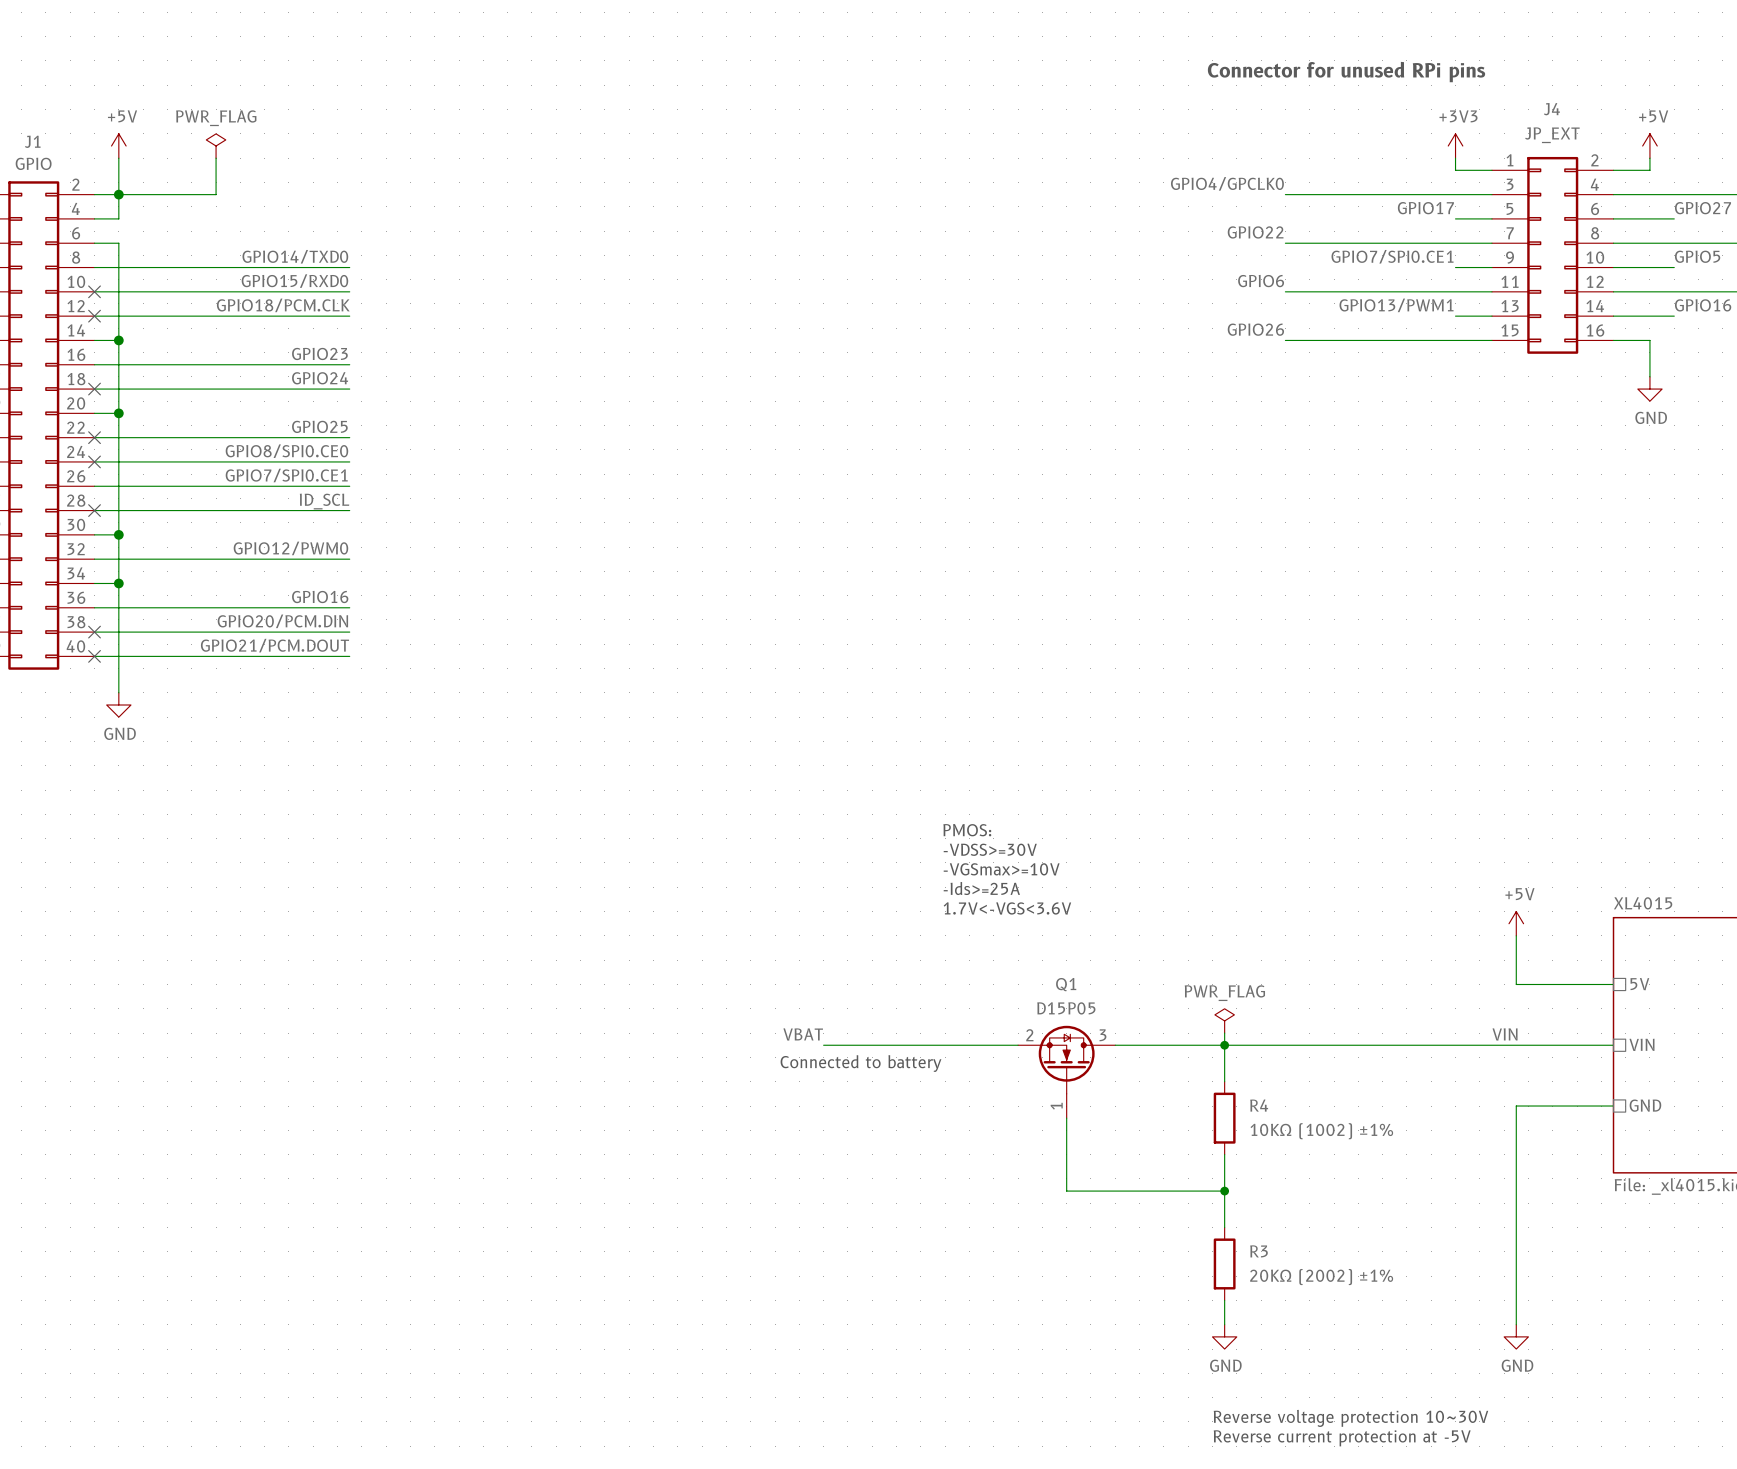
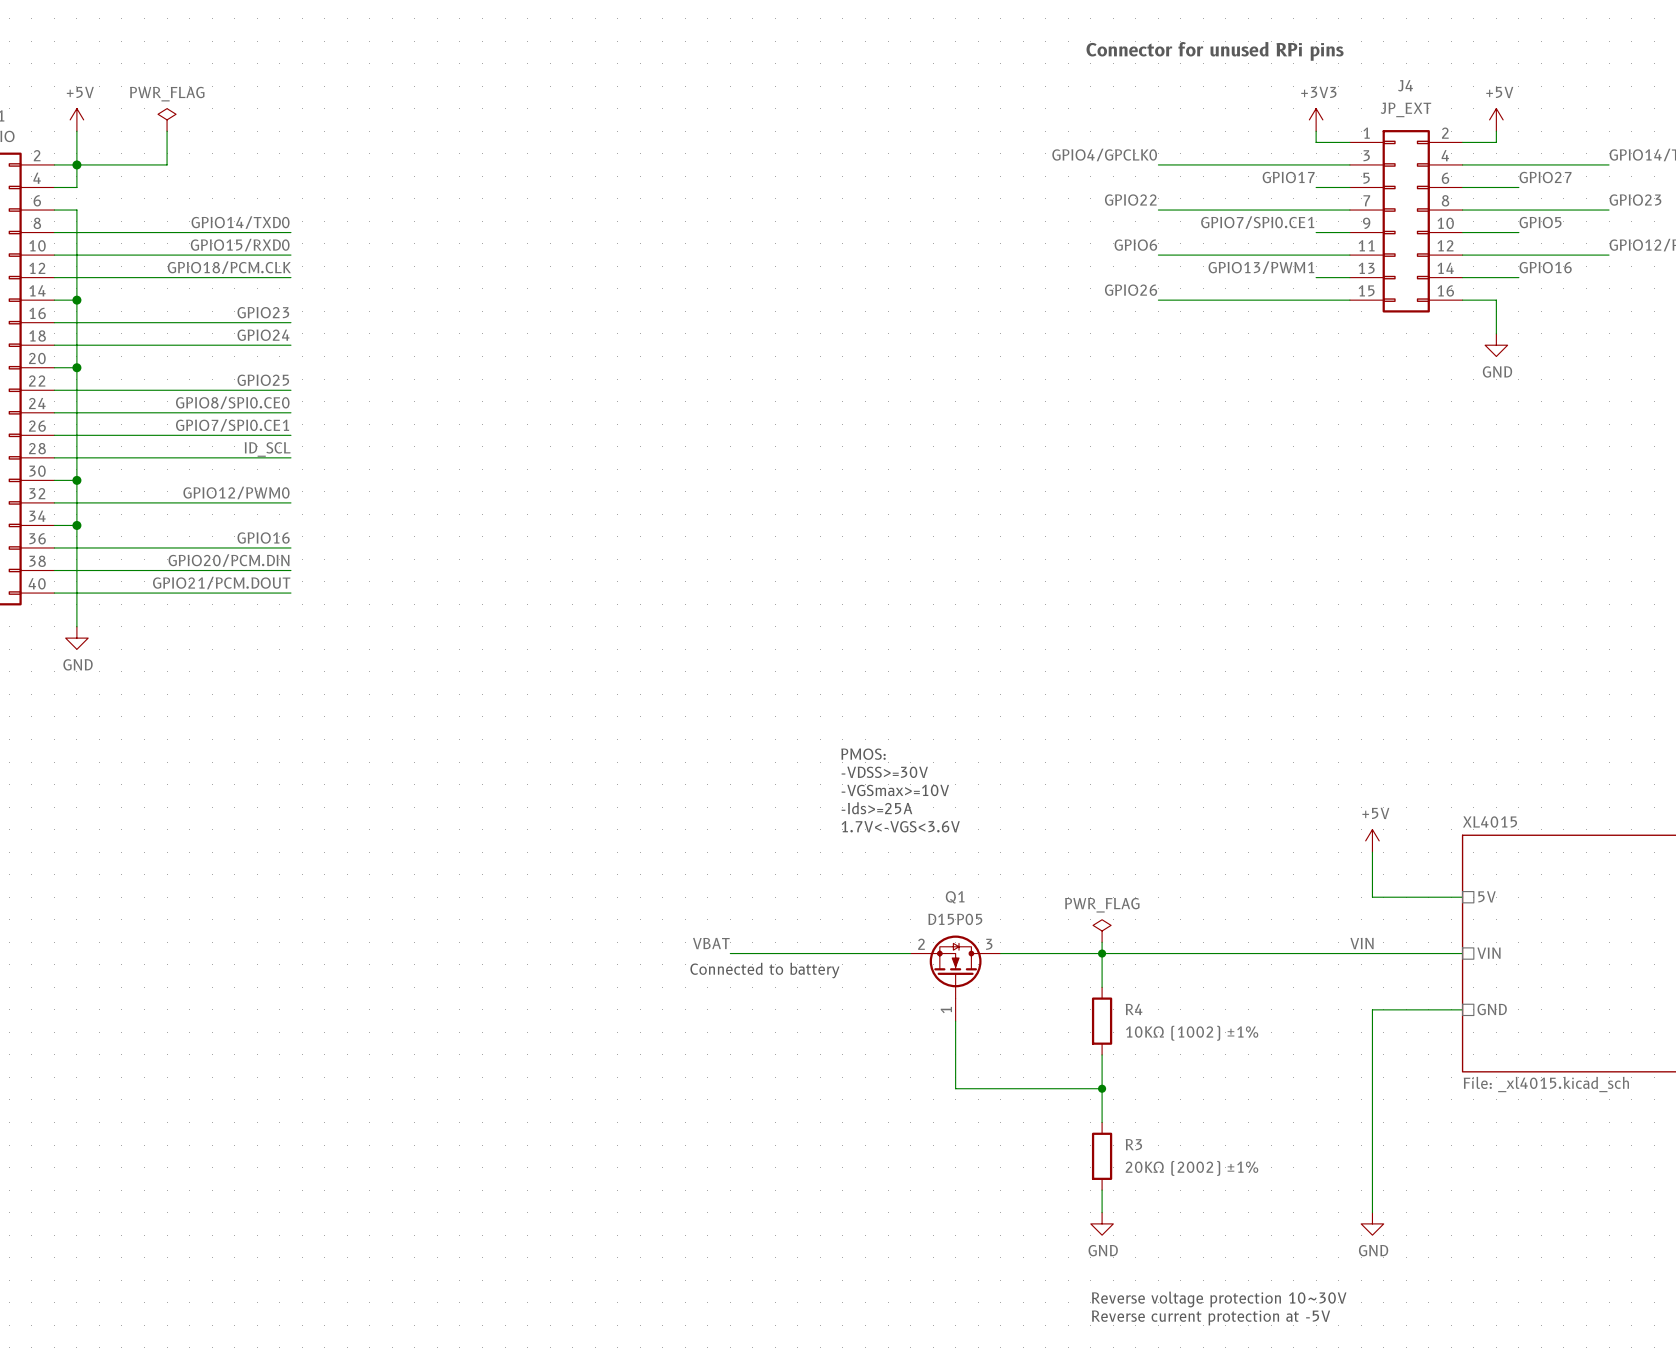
no-connect mark: (94, 291) -> none
no-connect mark: (94, 316) -> none
no-connect mark: (94, 389) -> none
no-connect mark: (94, 437) -> none
no-connect mark: (94, 461) -> none
no-connect mark: (94, 510) -> none
no-connect mark: (94, 632) -> none
no-connect mark: (94, 656) -> none

